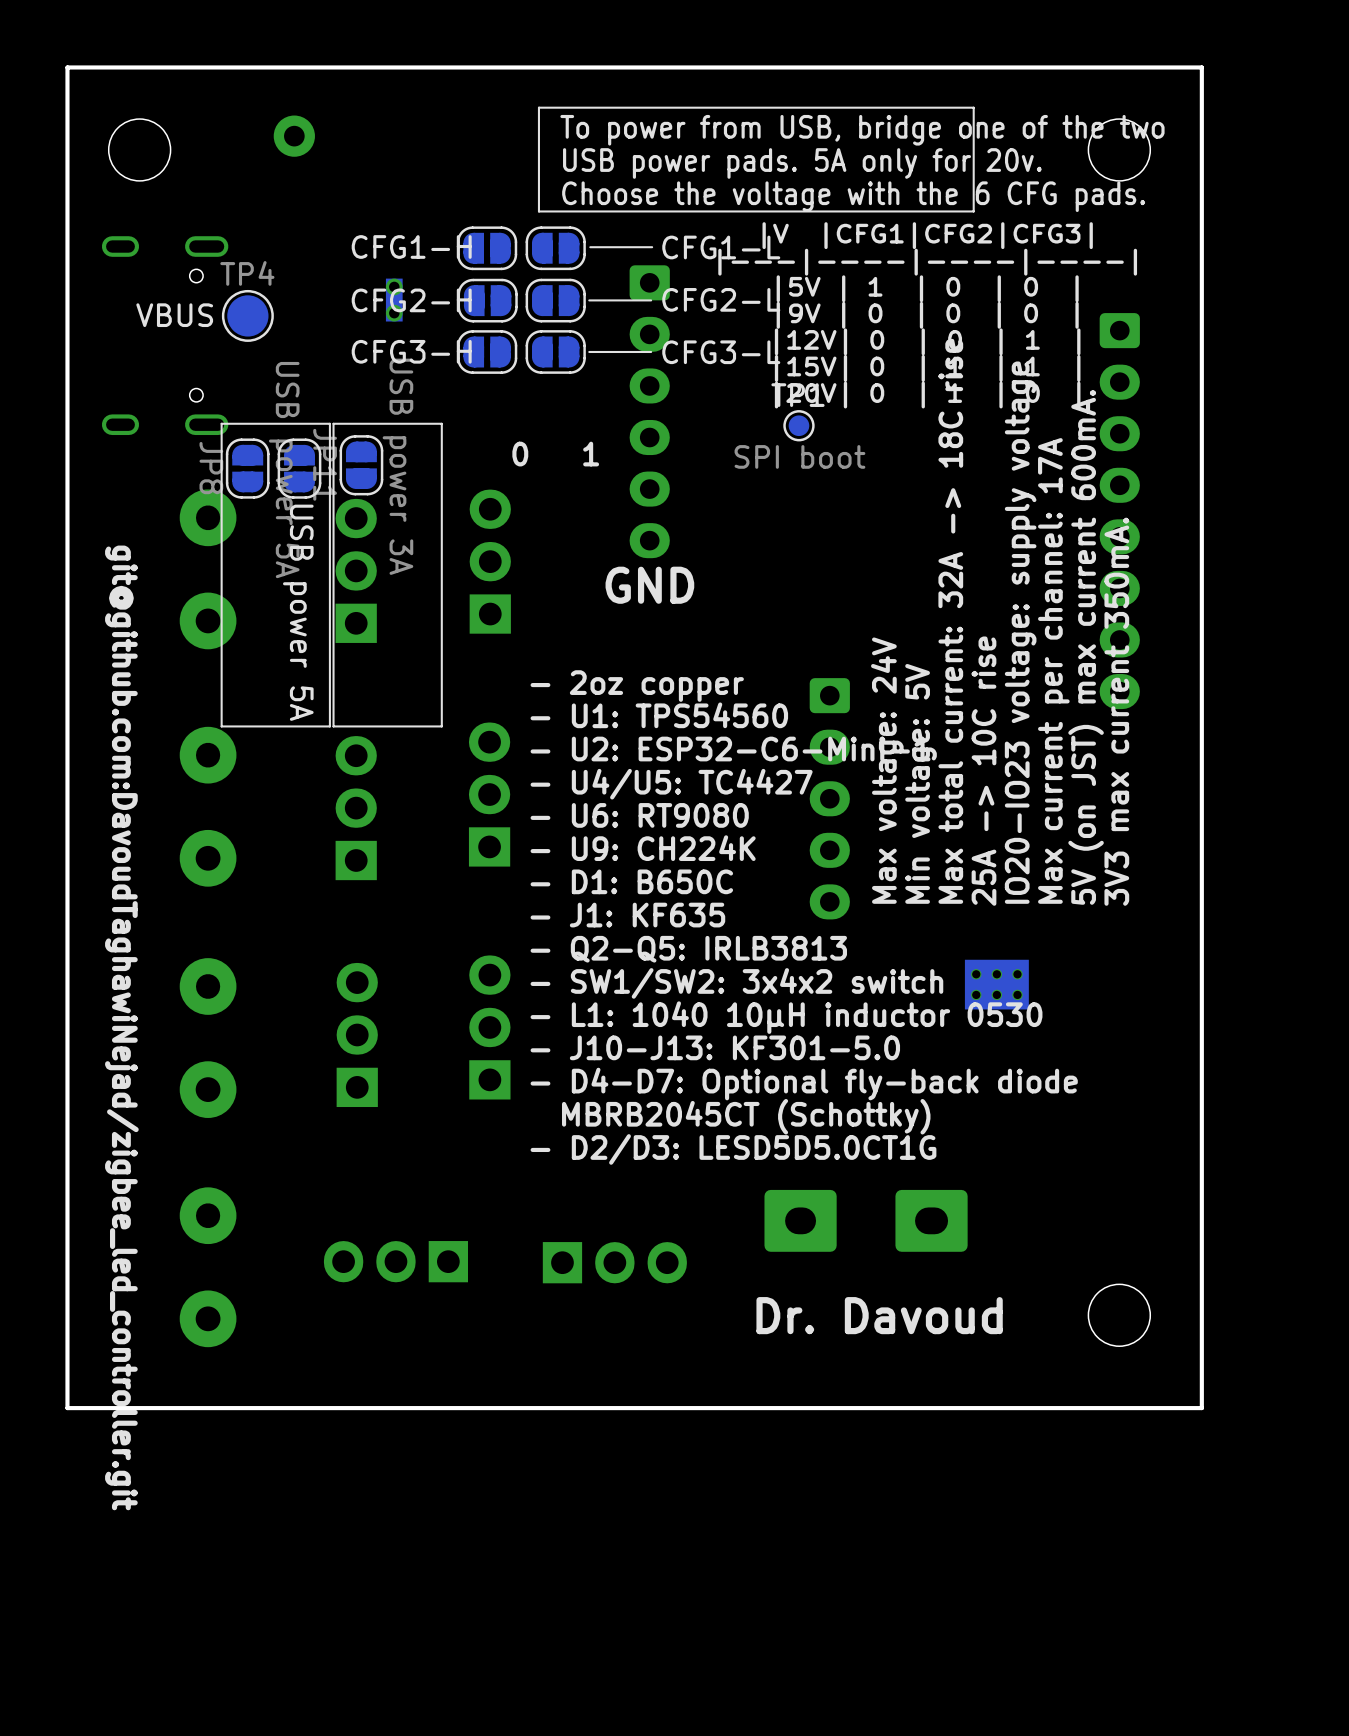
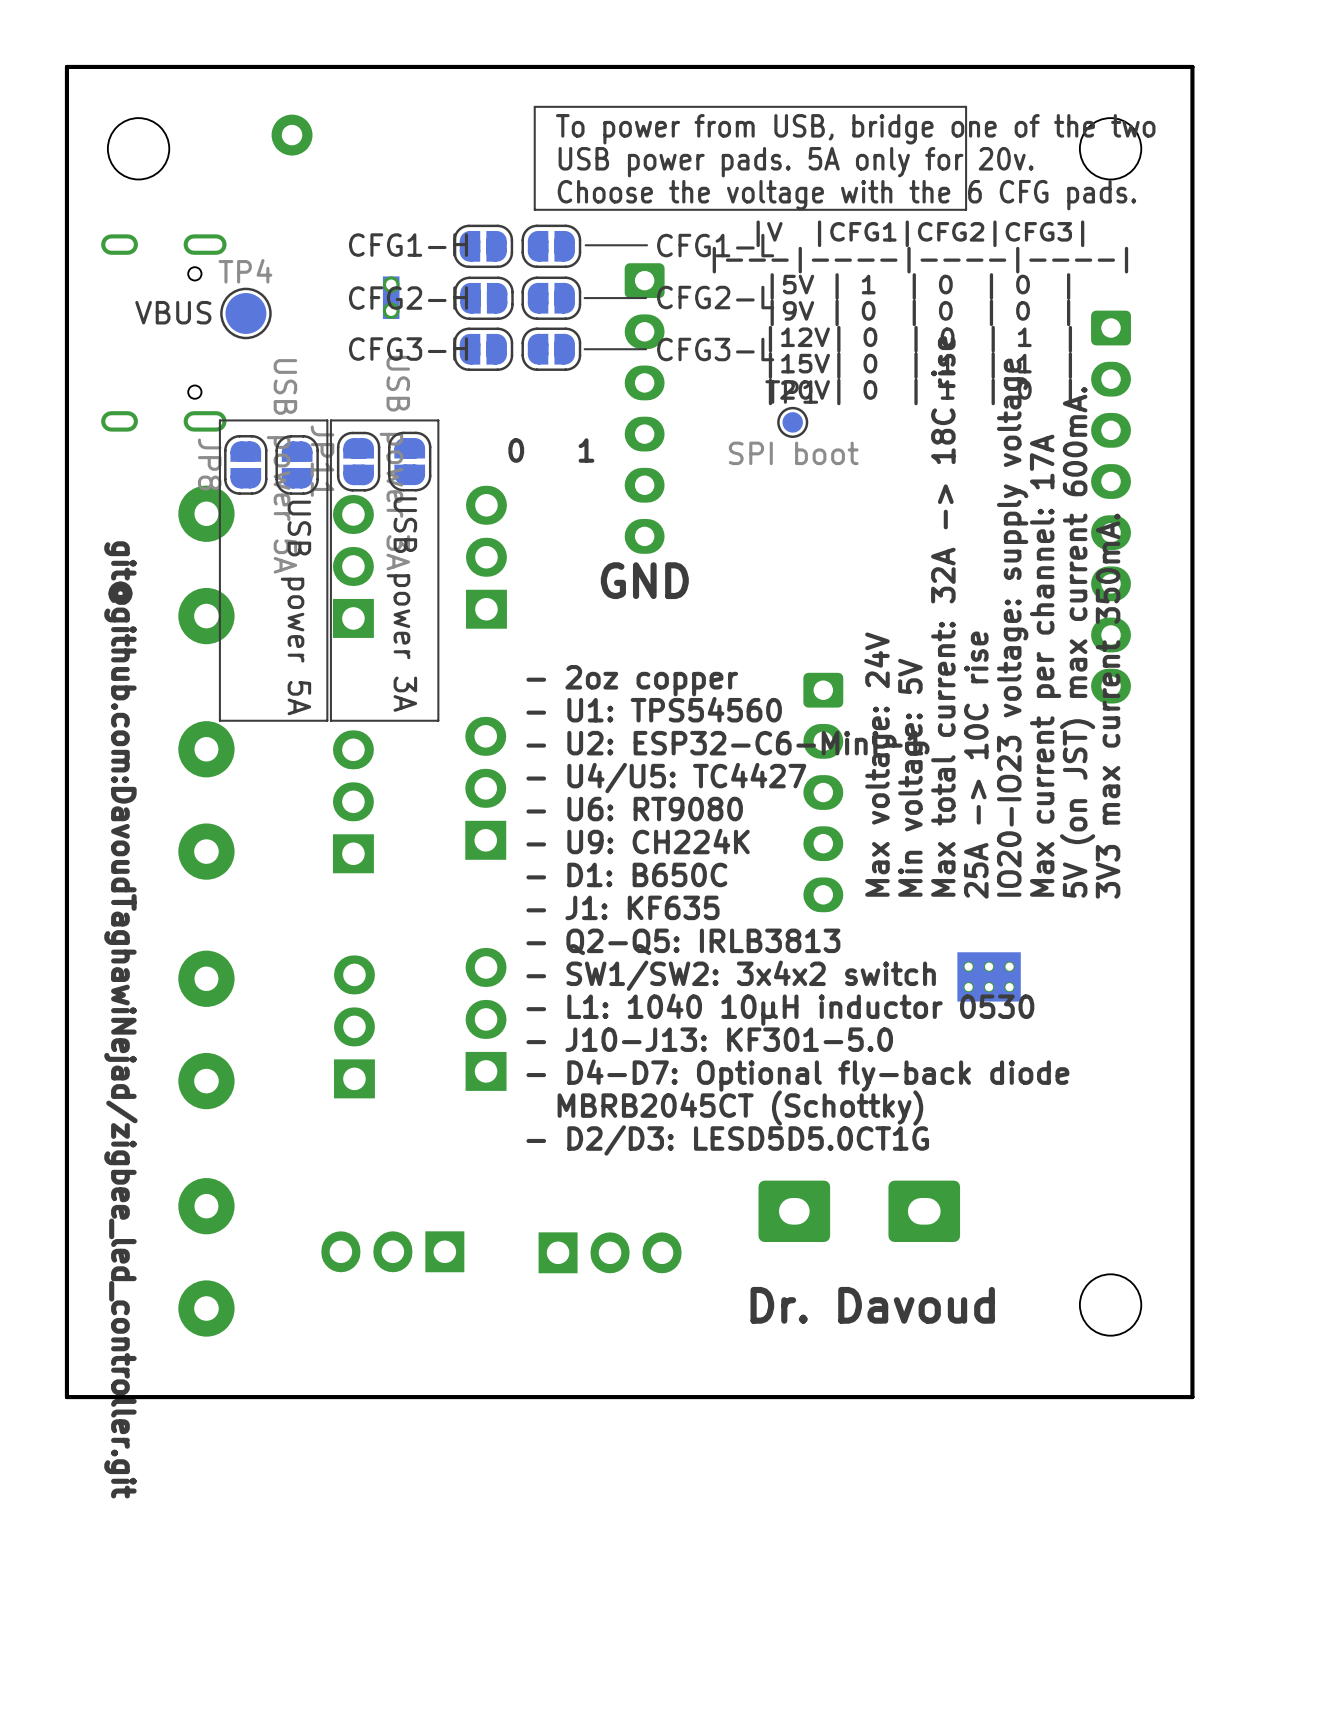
part: none -> USB power 3A (409, 461)

